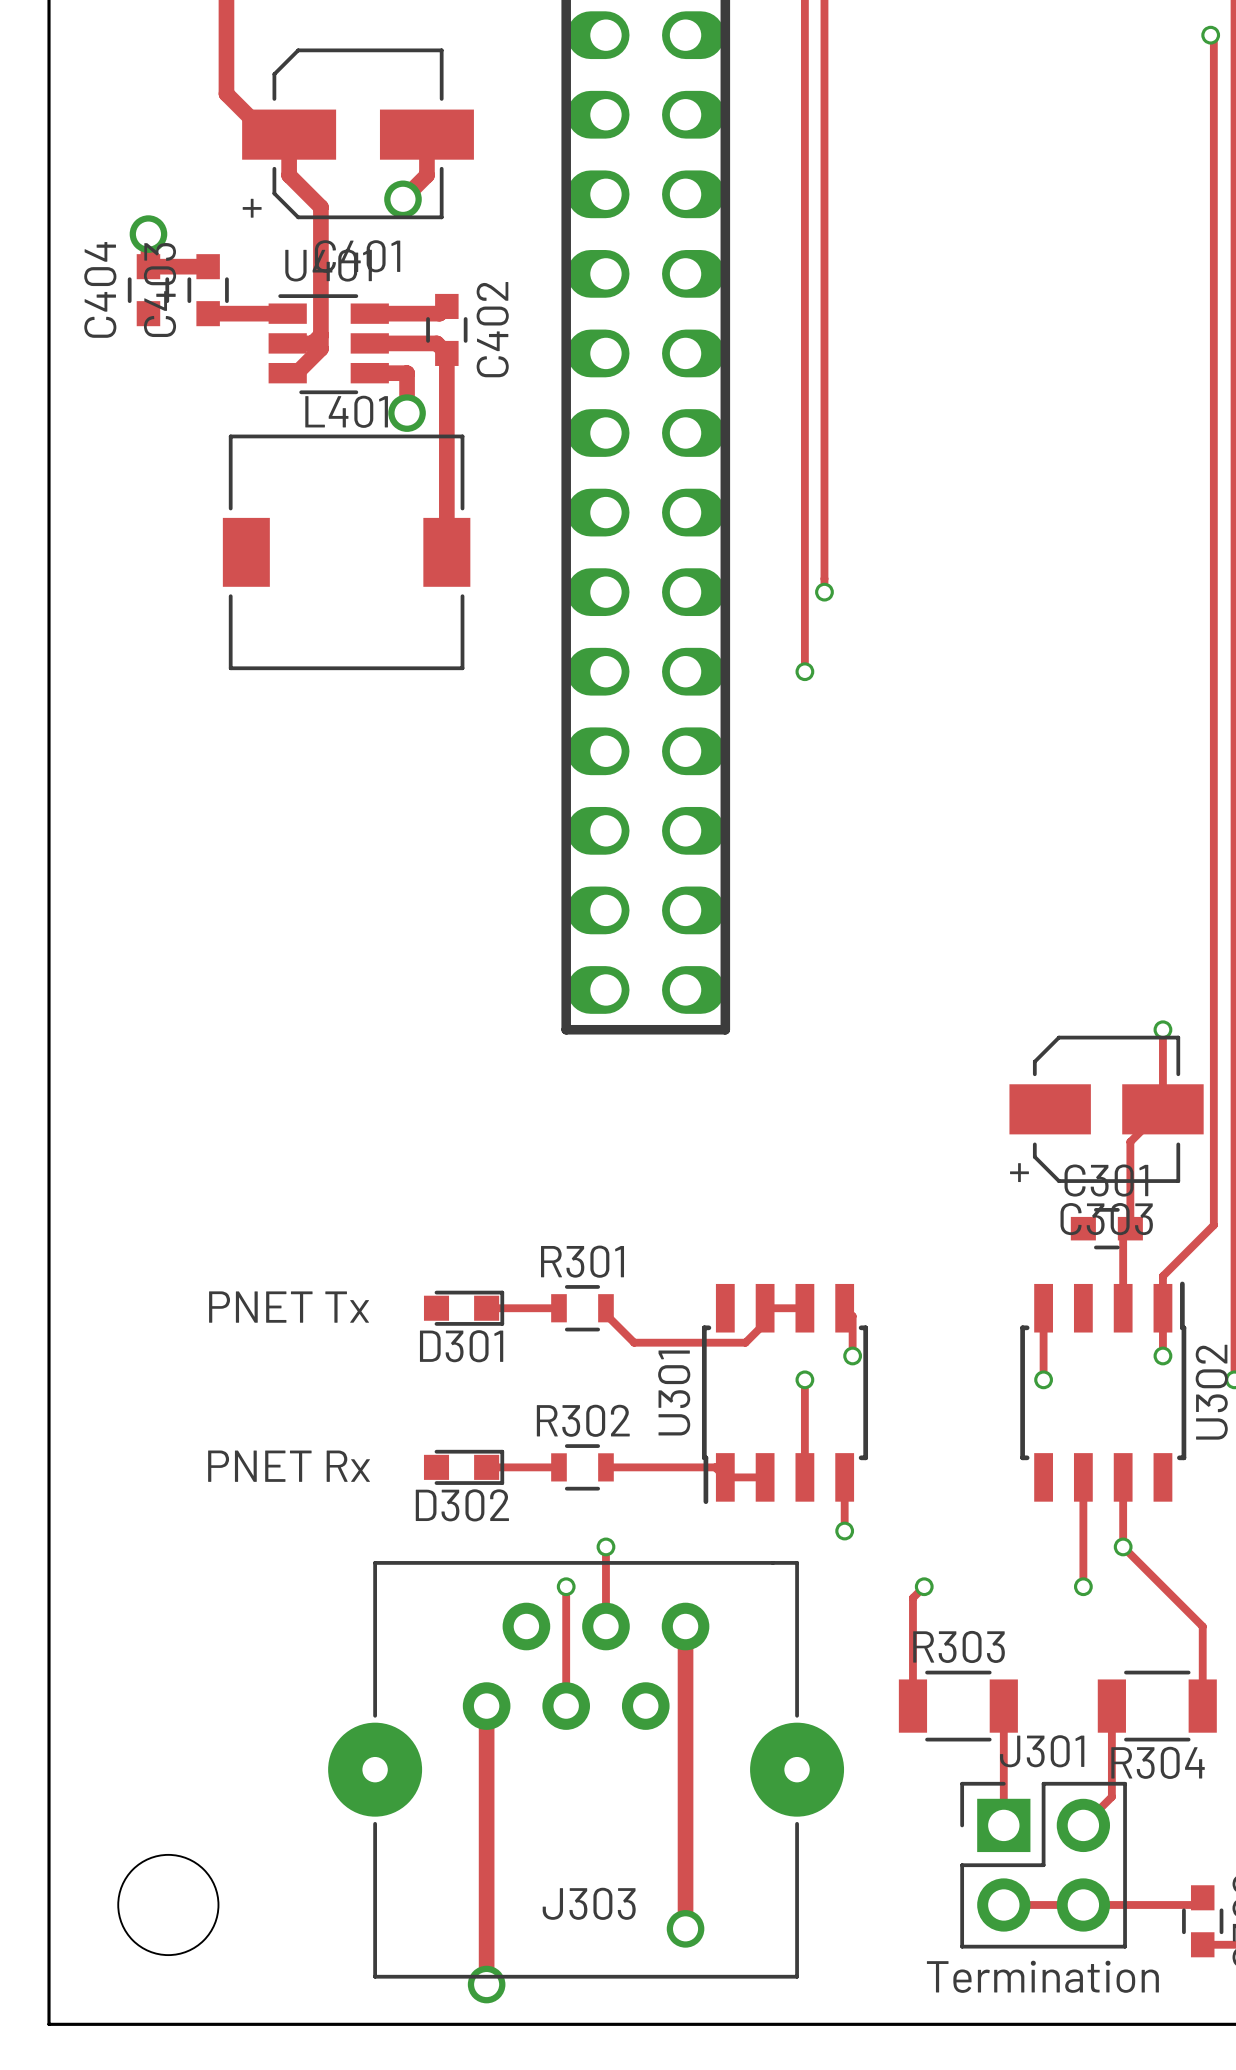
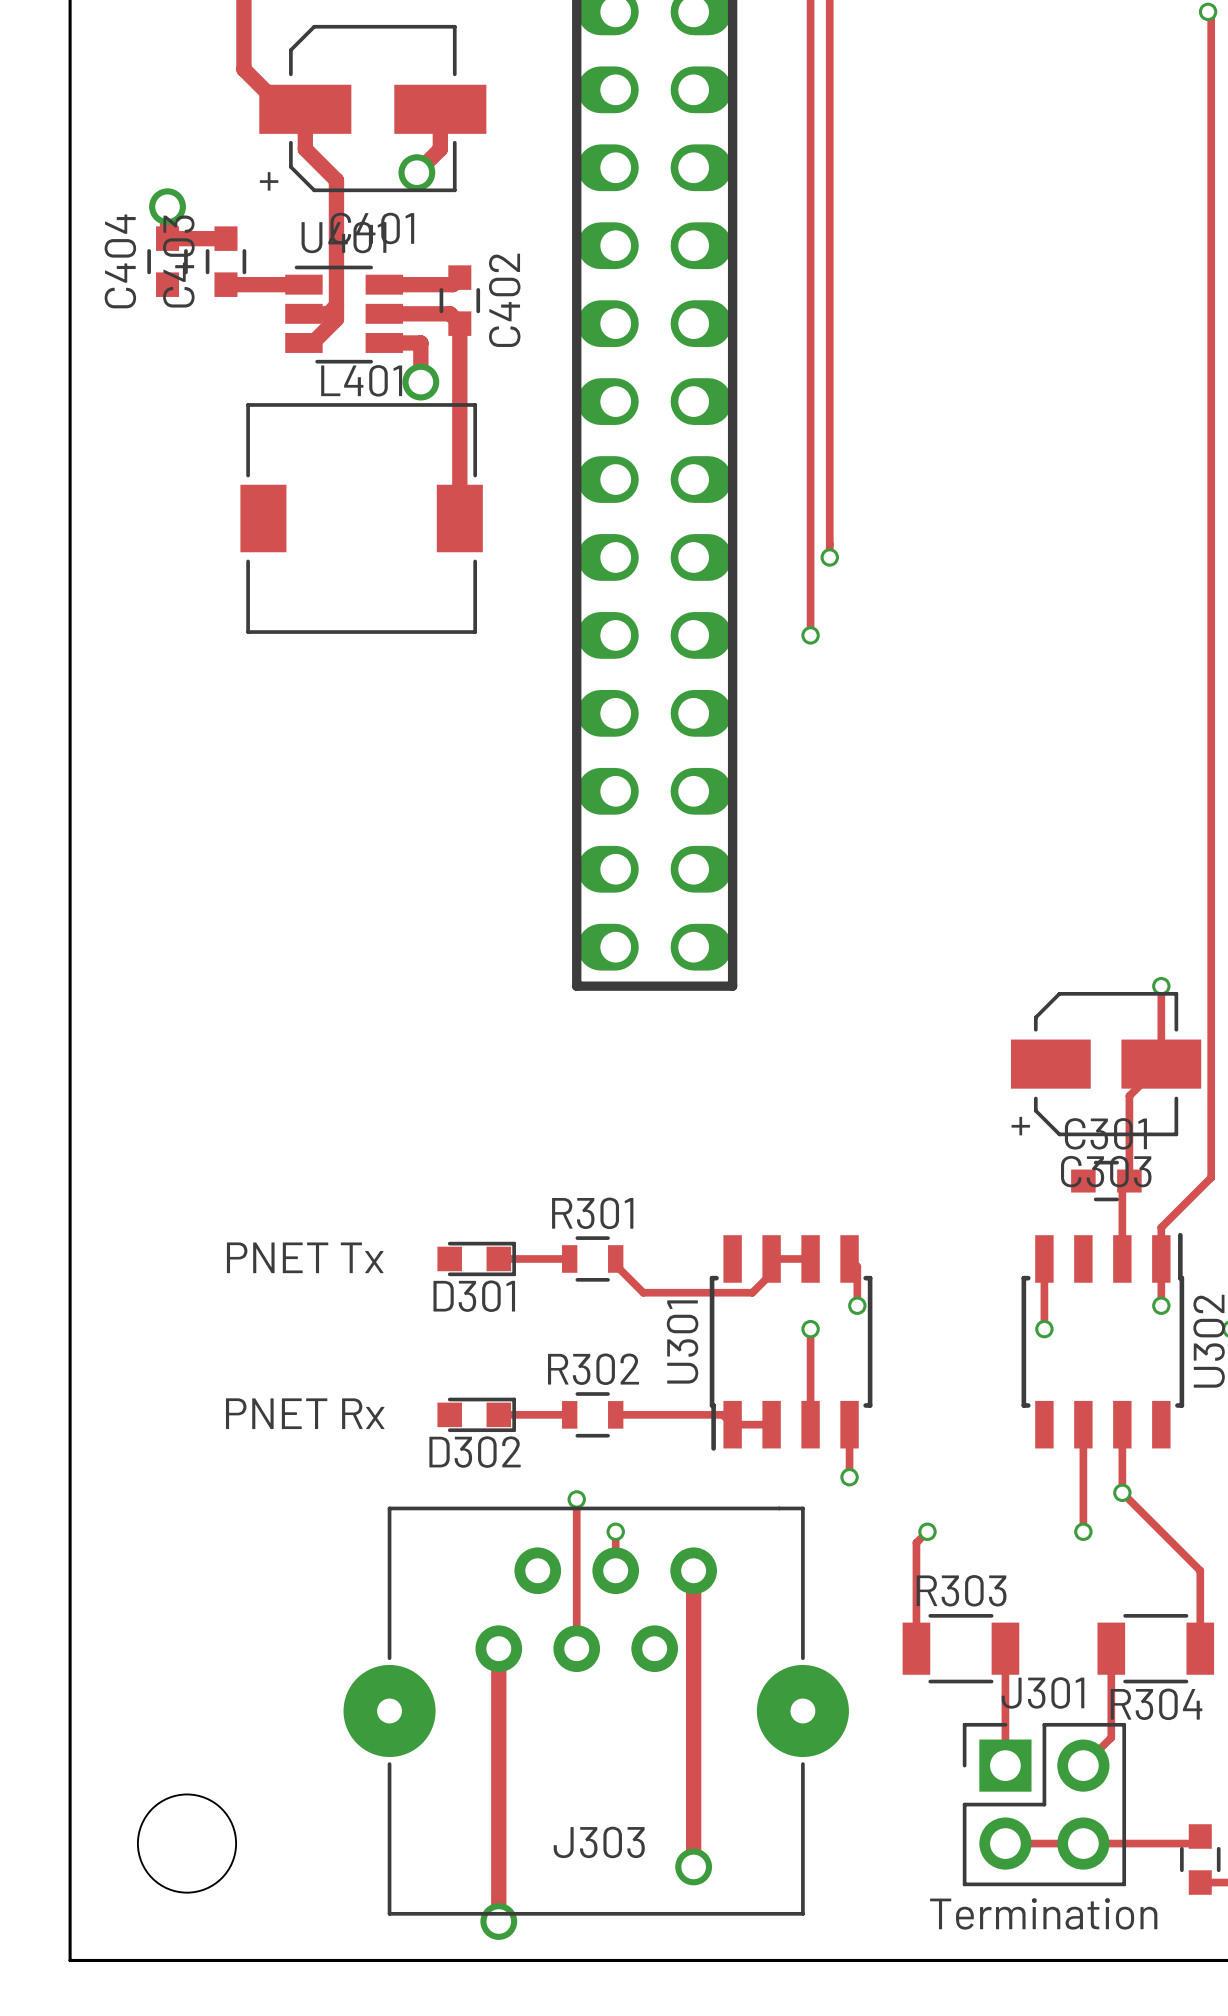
track: (605, 1546) (605, 1586) -> none
via: (605, 1546) -> none
track: none -> (576, 1499) (576, 1531)
via: none -> (576, 1499)
via: (566, 1586) -> none
via: none -> (615, 1531)

